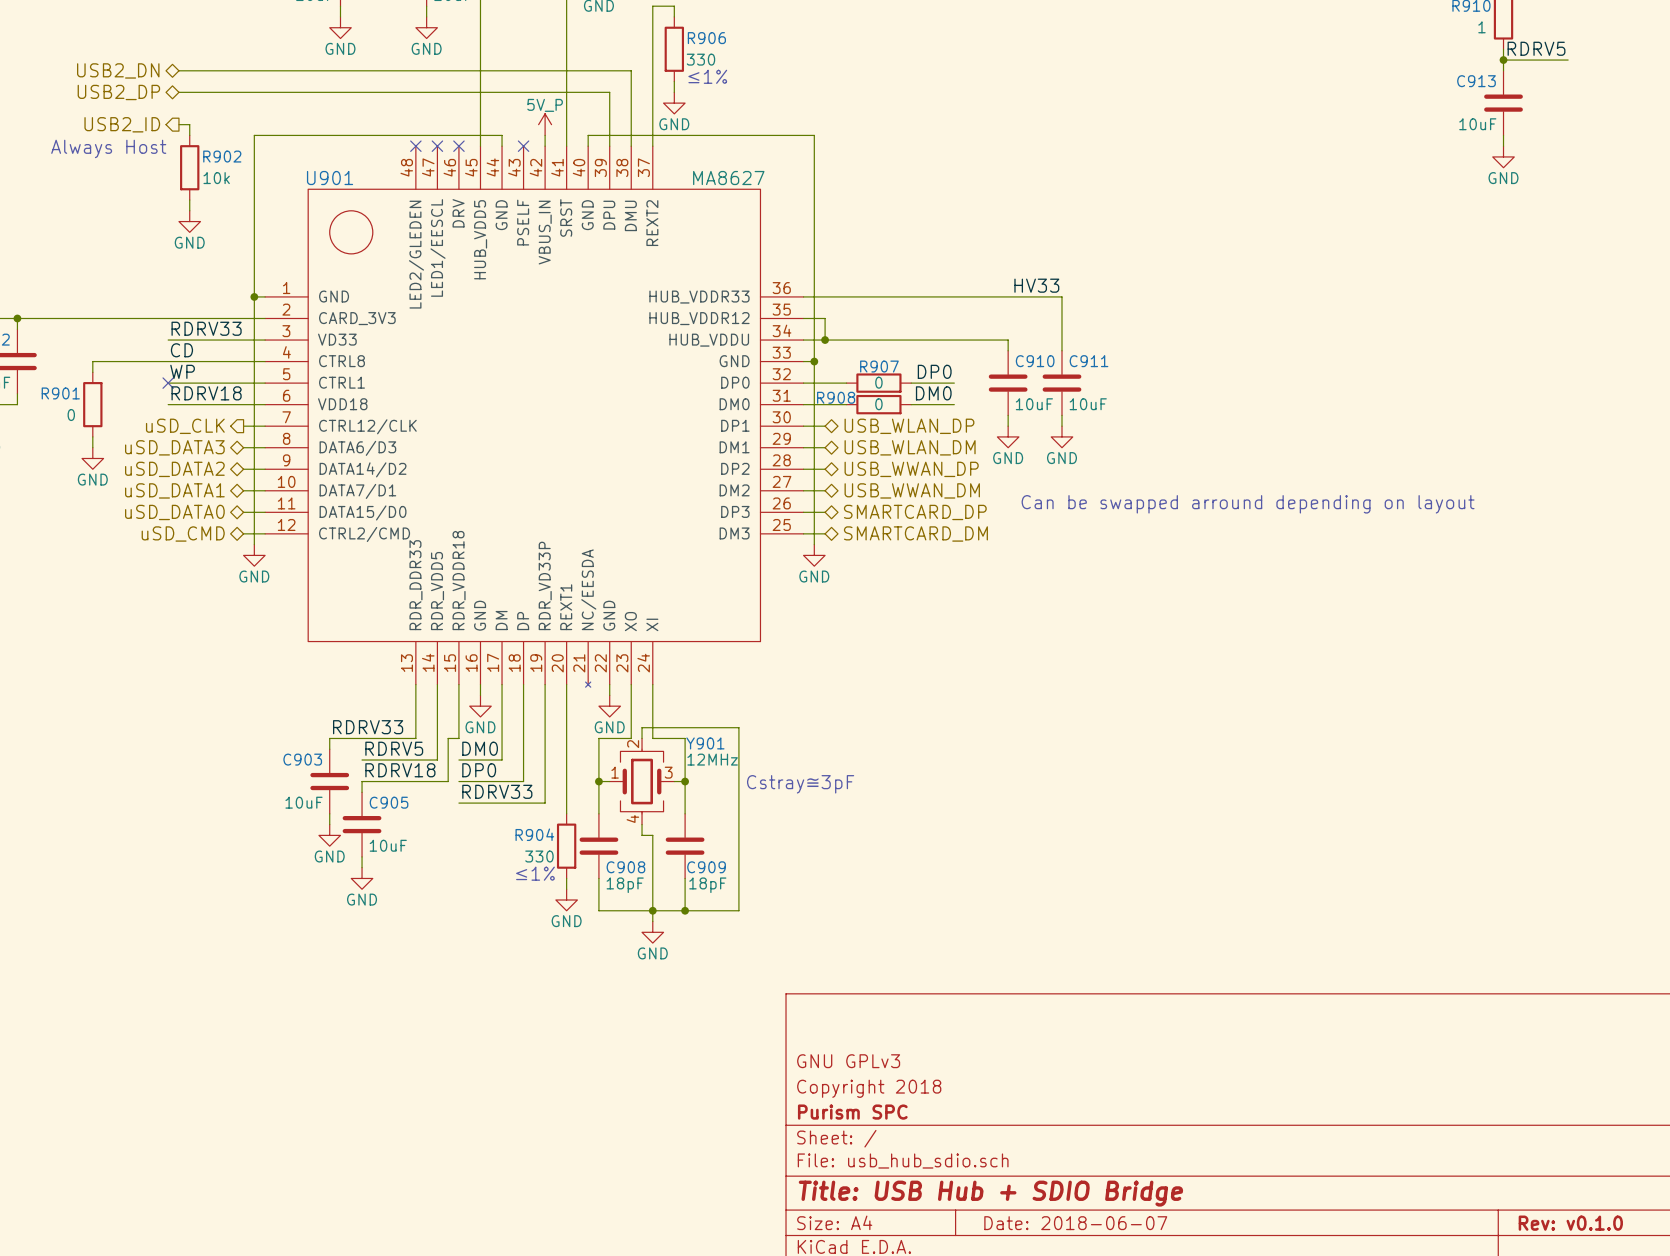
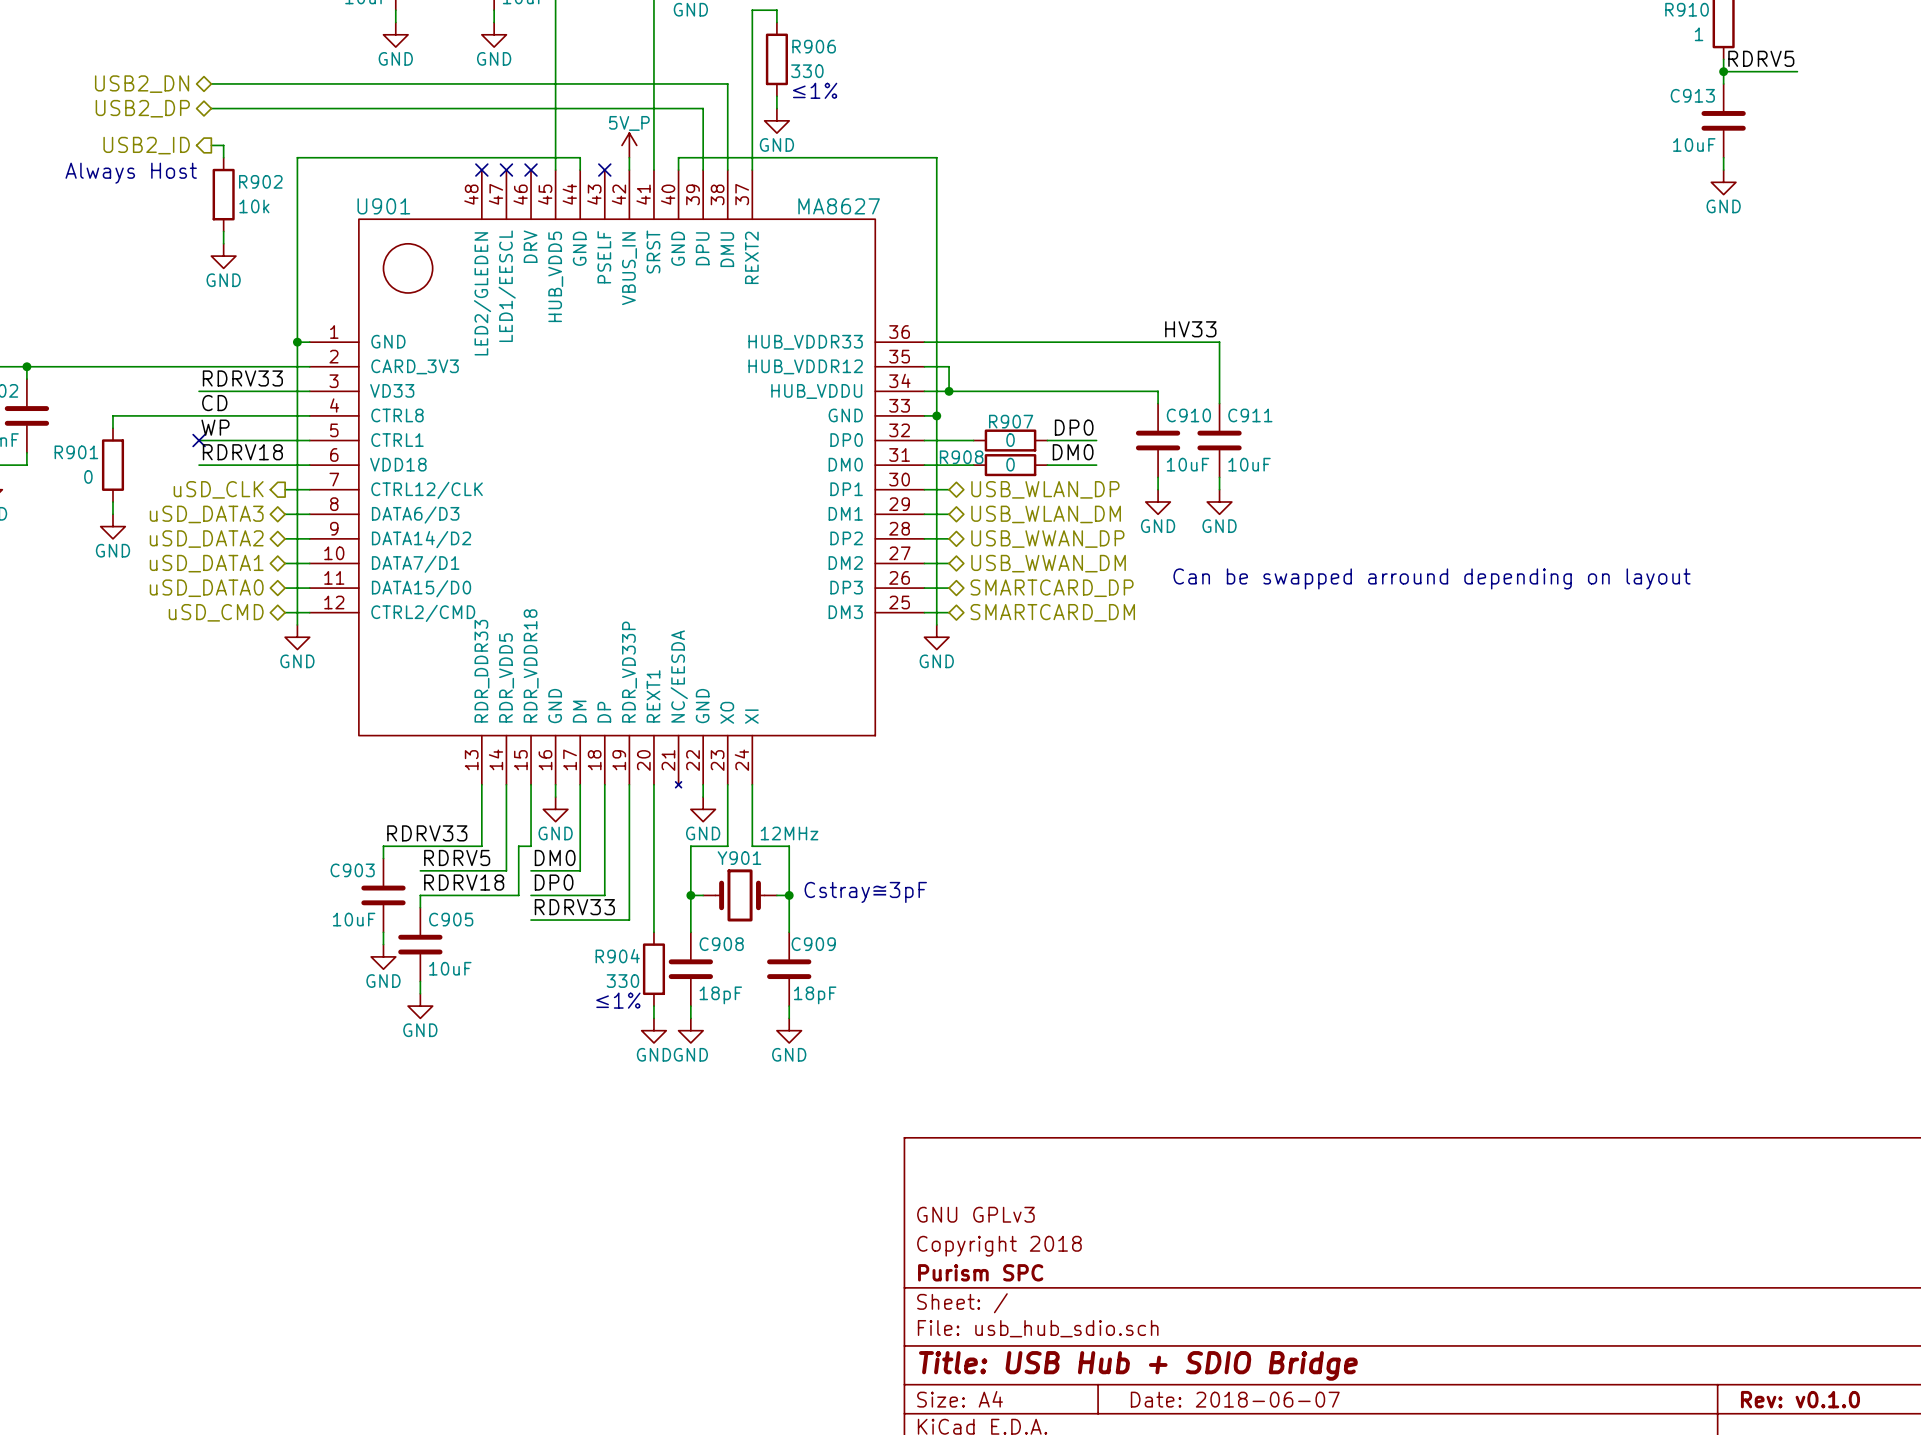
Y901 symbol: [609, 738, 675, 825] -> [703, 869, 777, 922]
wire: (642, 738) (642, 727) (738, 727) (738, 910) (598, 910) (598, 889) -> none
Y901 name position: Y901 (705, 743) -> Y901 (739, 858)
Y901 value position: 12MHz (712, 759) -> 12MHz (789, 833)
text position: Cstray≅3pF (800, 784) -> Cstray≅3pF (865, 892)
wire: (642, 824) (642, 835) (652, 835) (652, 921) -> none
C908 name position: C908 (625, 867) -> C908 (721, 944)
C909 name position: C909 (706, 867) -> C909 (813, 944)
C908 value position: 18pF (625, 885) -> 18pF (720, 995)
C909 value position: 18pF (707, 885) -> 18pF (815, 995)
power symbol: none -> GND (690, 1030)
power symbol: none -> GND (789, 1030)
junction: (652, 910) -> none
junction: (685, 910) -> none
power symbol: GND (652, 932) -> none

